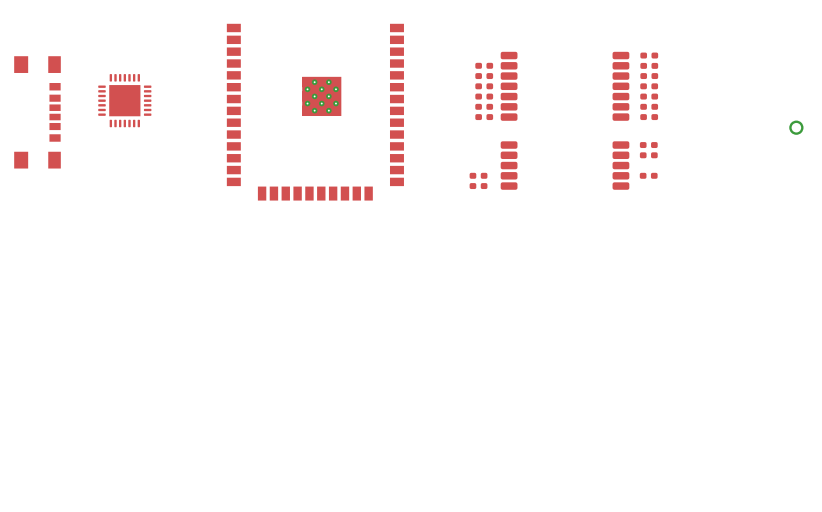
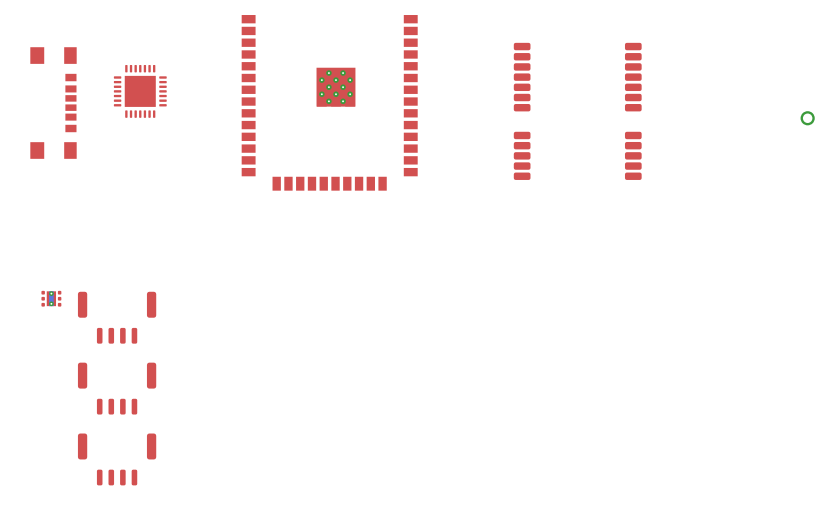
part: (649, 55) -> none
part: (484, 65) -> none
part: (649, 65) -> none
part: (484, 76) -> none
part: (649, 76) -> none
part: (484, 86) -> none
part: (649, 86) -> none
part: (484, 96) -> none
part: (649, 96) -> none
part: (484, 106) -> none
part: (649, 106) -> none
part: (484, 117) -> none
part: (649, 117) -> none
part: (648, 145) -> none
part: (648, 155) -> none
part: (478, 175) -> none
part: (648, 175) -> none
part: (478, 186) -> none
part: none -> (51, 298)
part: none -> (117, 317)
part: none -> (117, 388)
part: none -> (117, 459)

